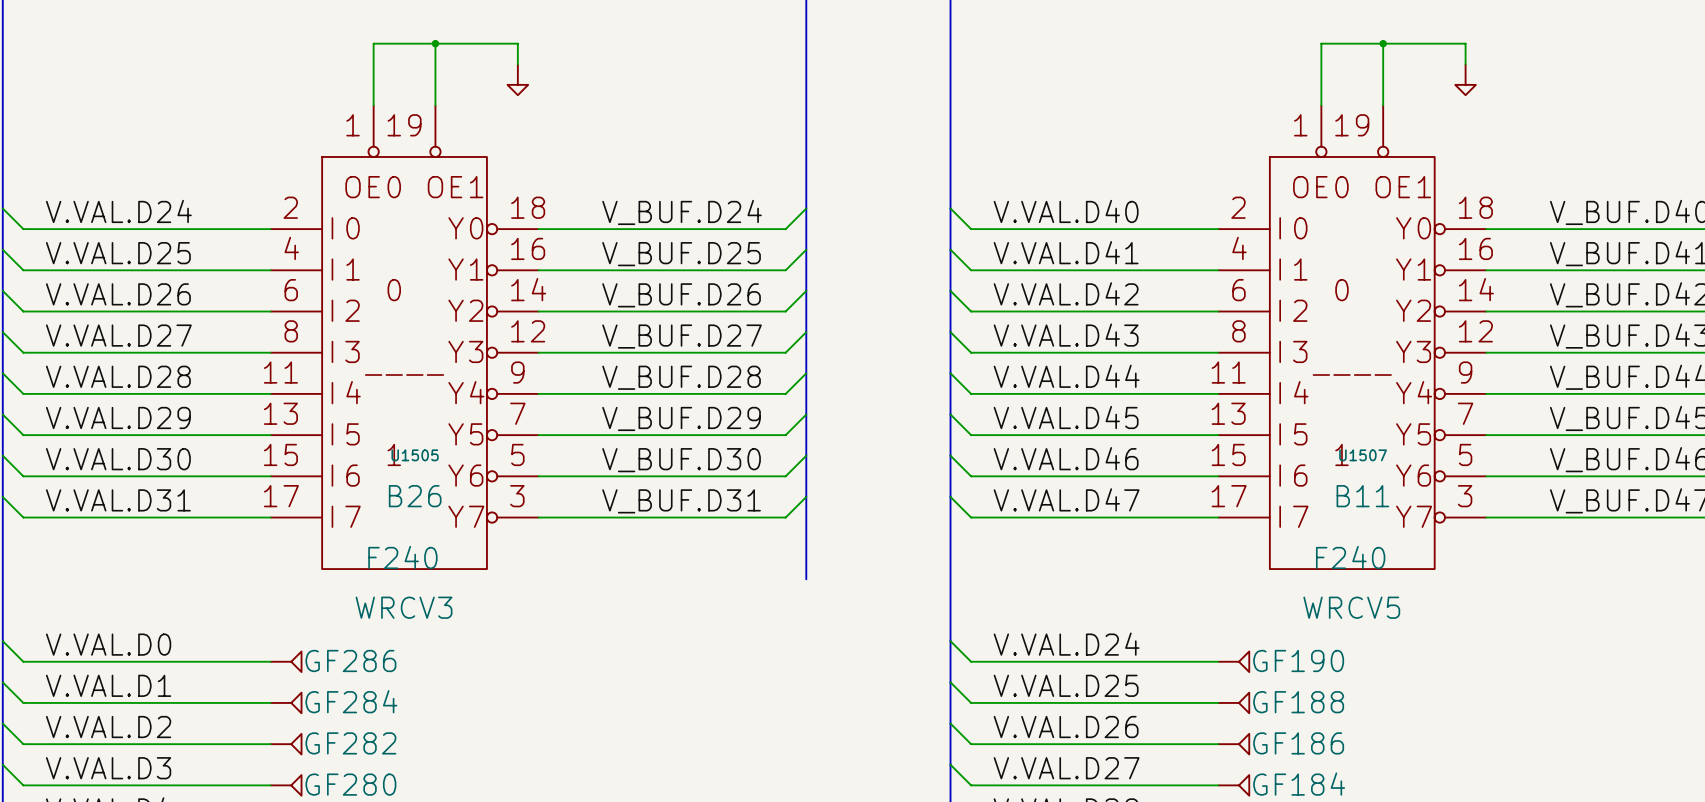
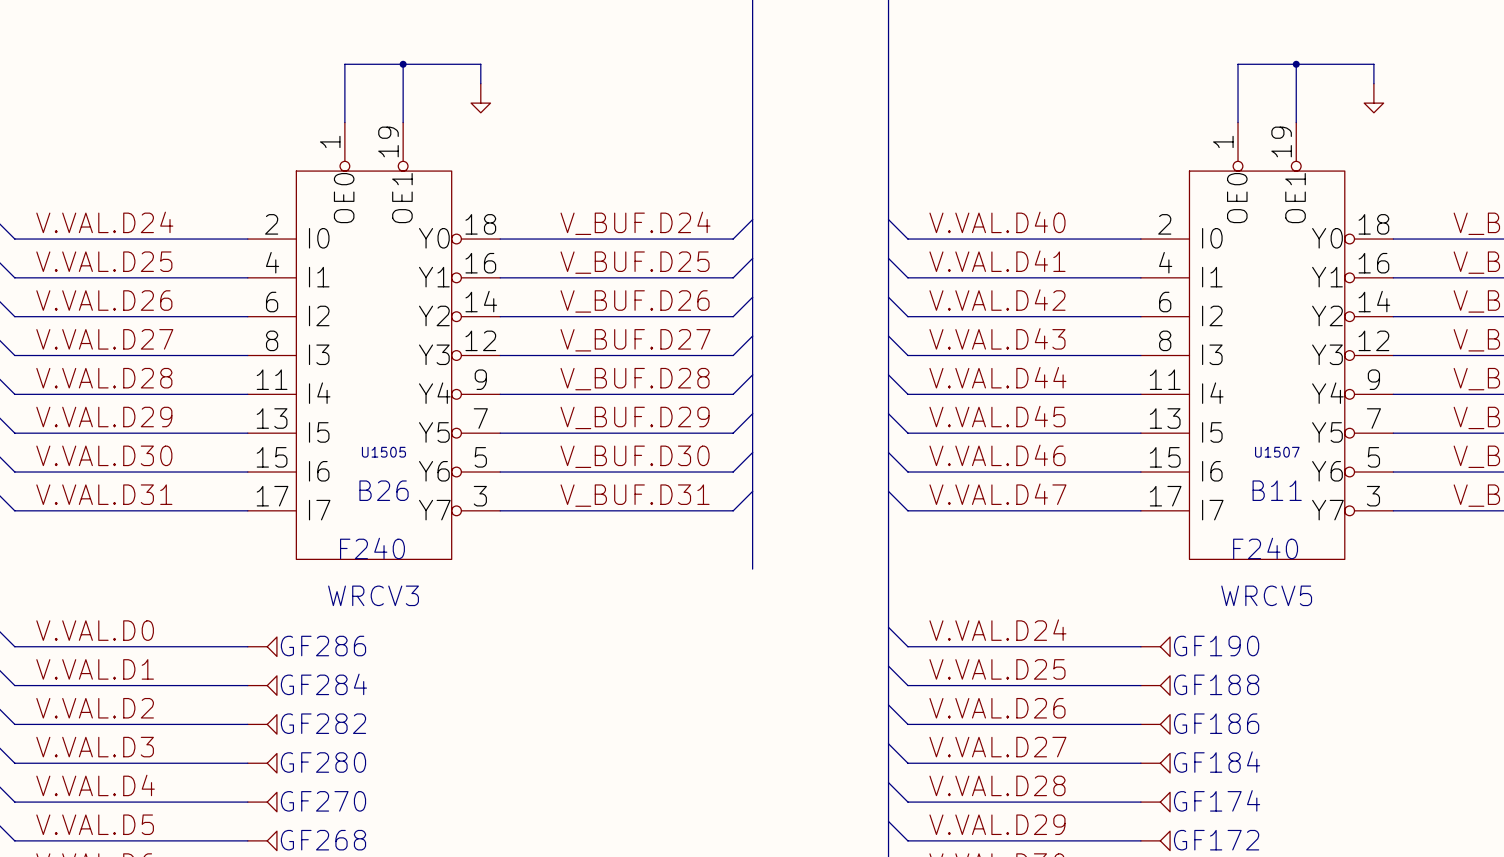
U1505 symbol: [270, 105, 539, 570] -> [247, 122, 501, 560]
U1507 symbol: [1218, 105, 1487, 570] -> [1140, 122, 1394, 560]

